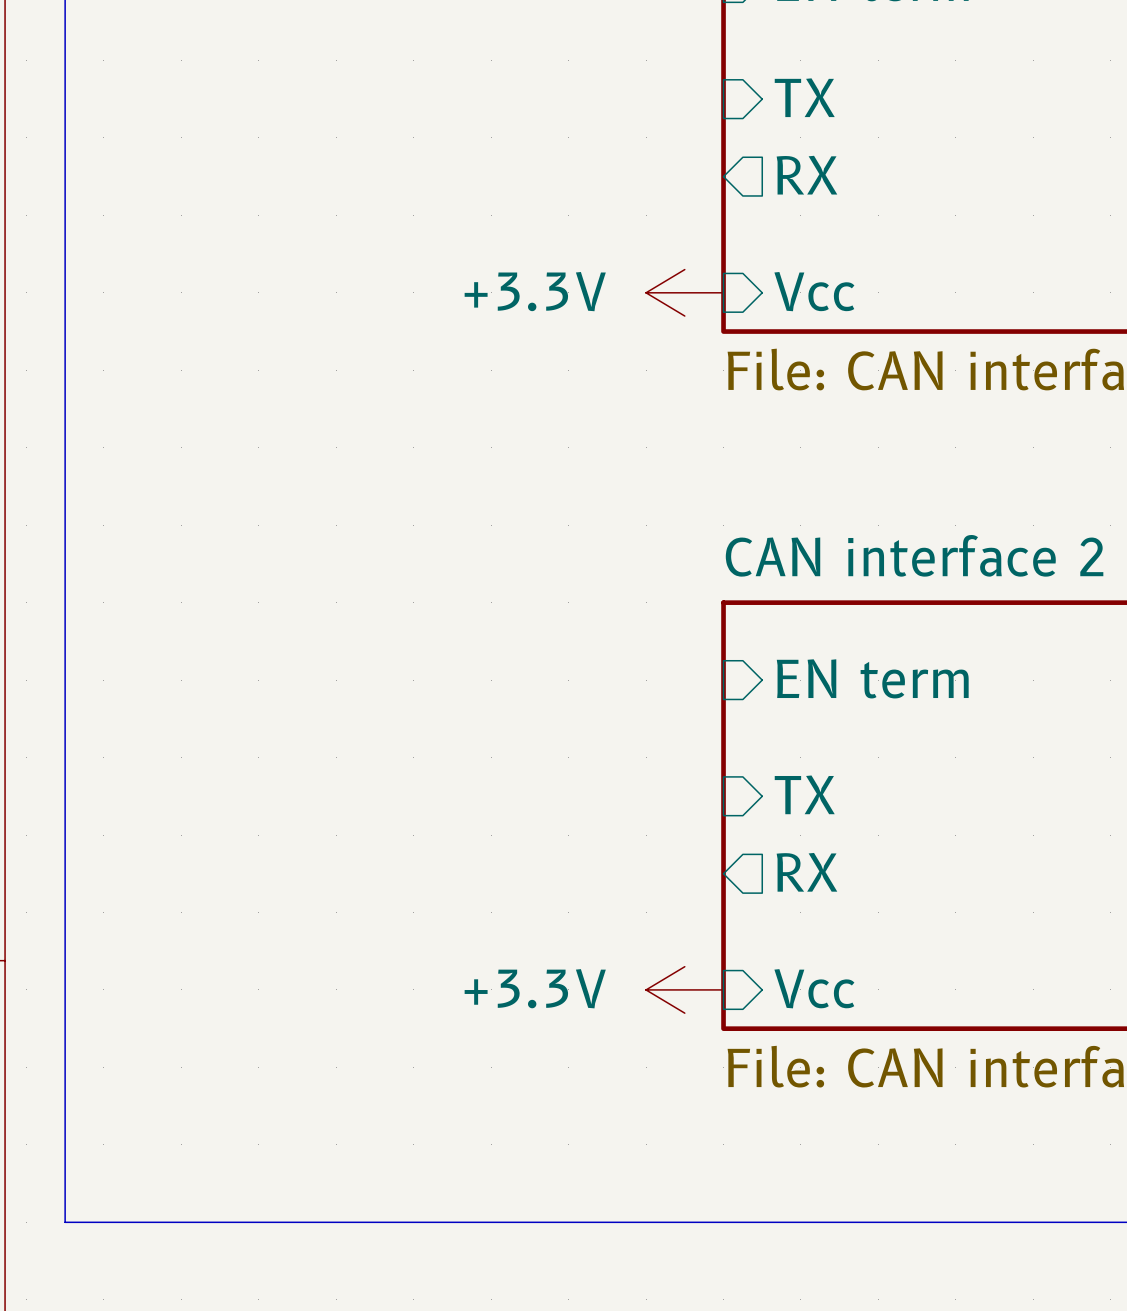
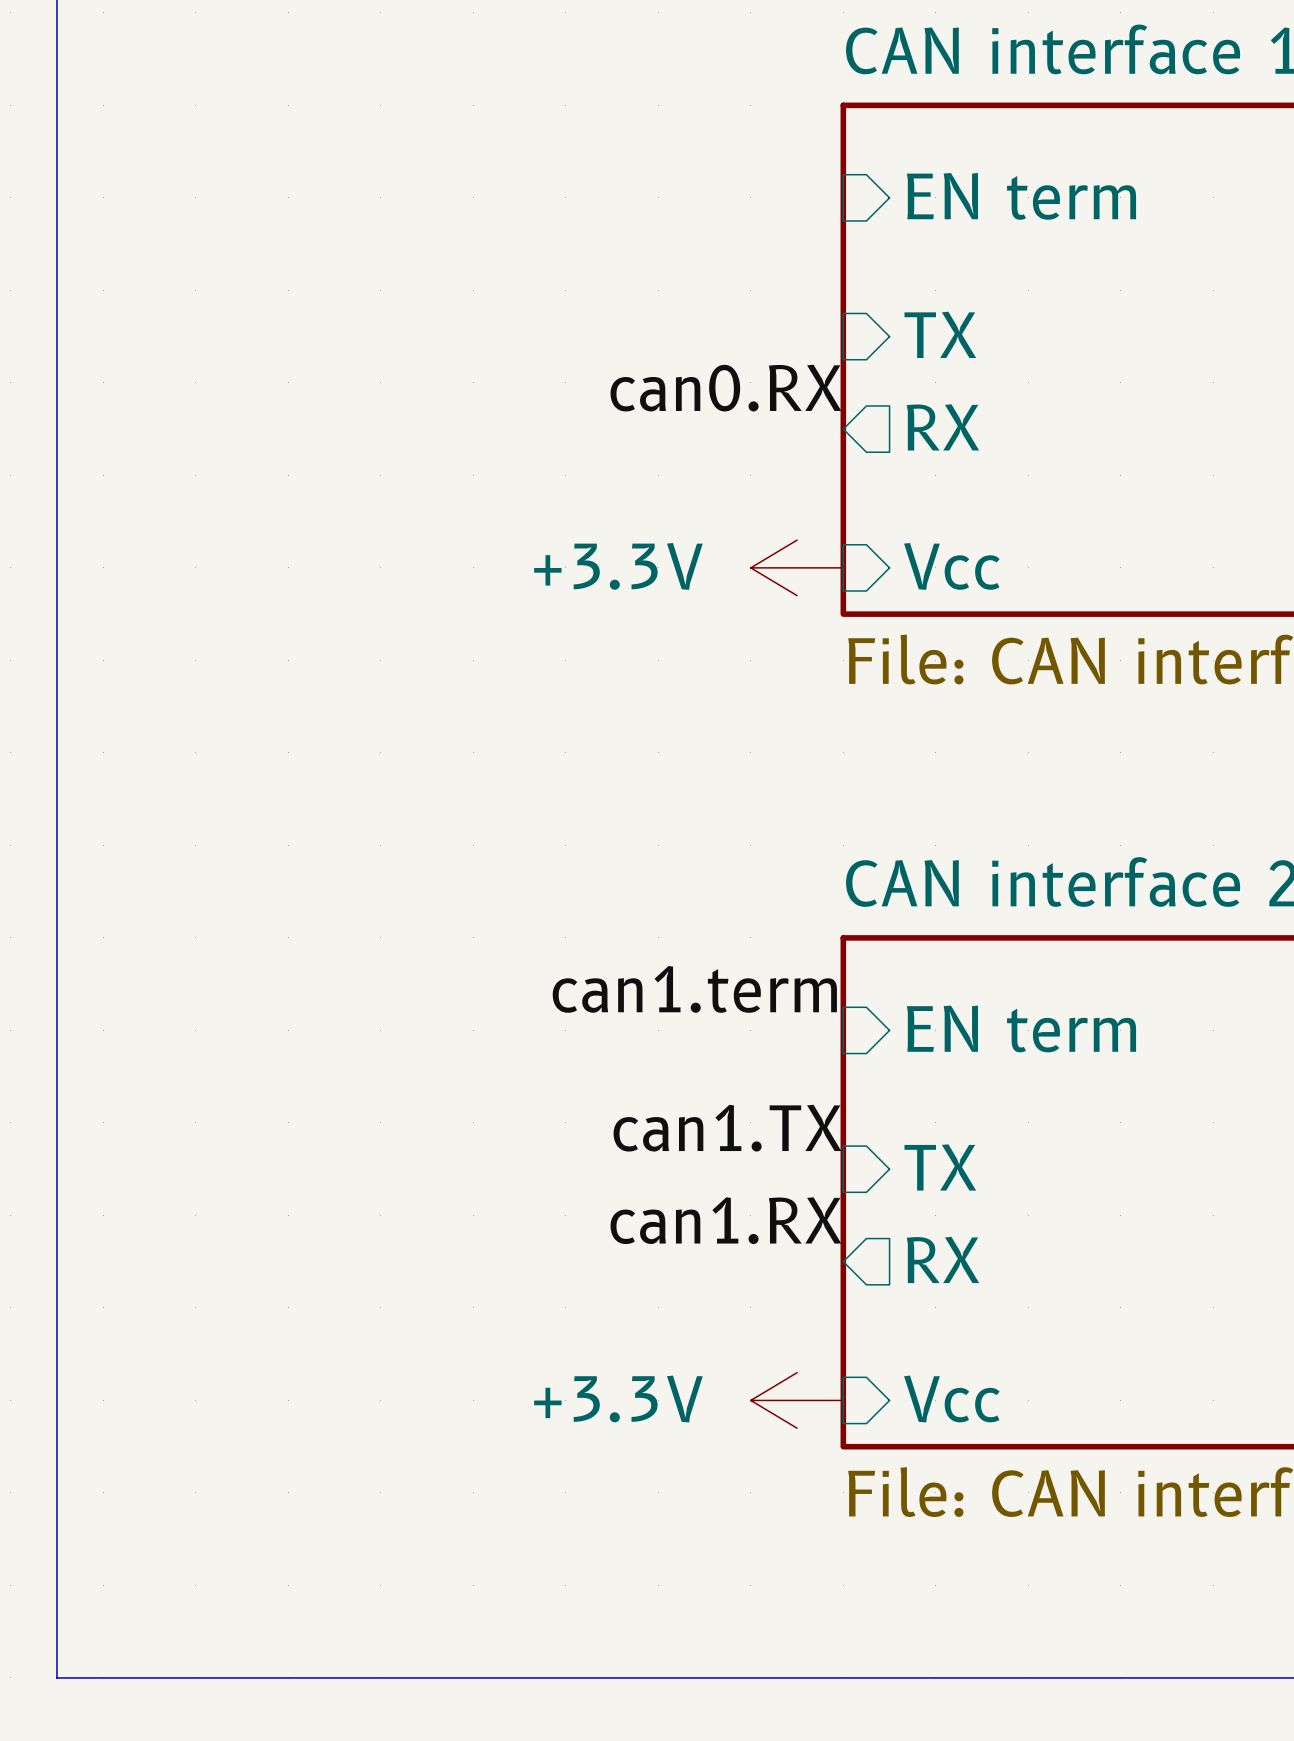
label: none -> can0.RX (725, 388)
label: none -> can1.term (694, 989)
label: none -> can1.TX (727, 1128)
label: none -> can1.RX (725, 1220)

